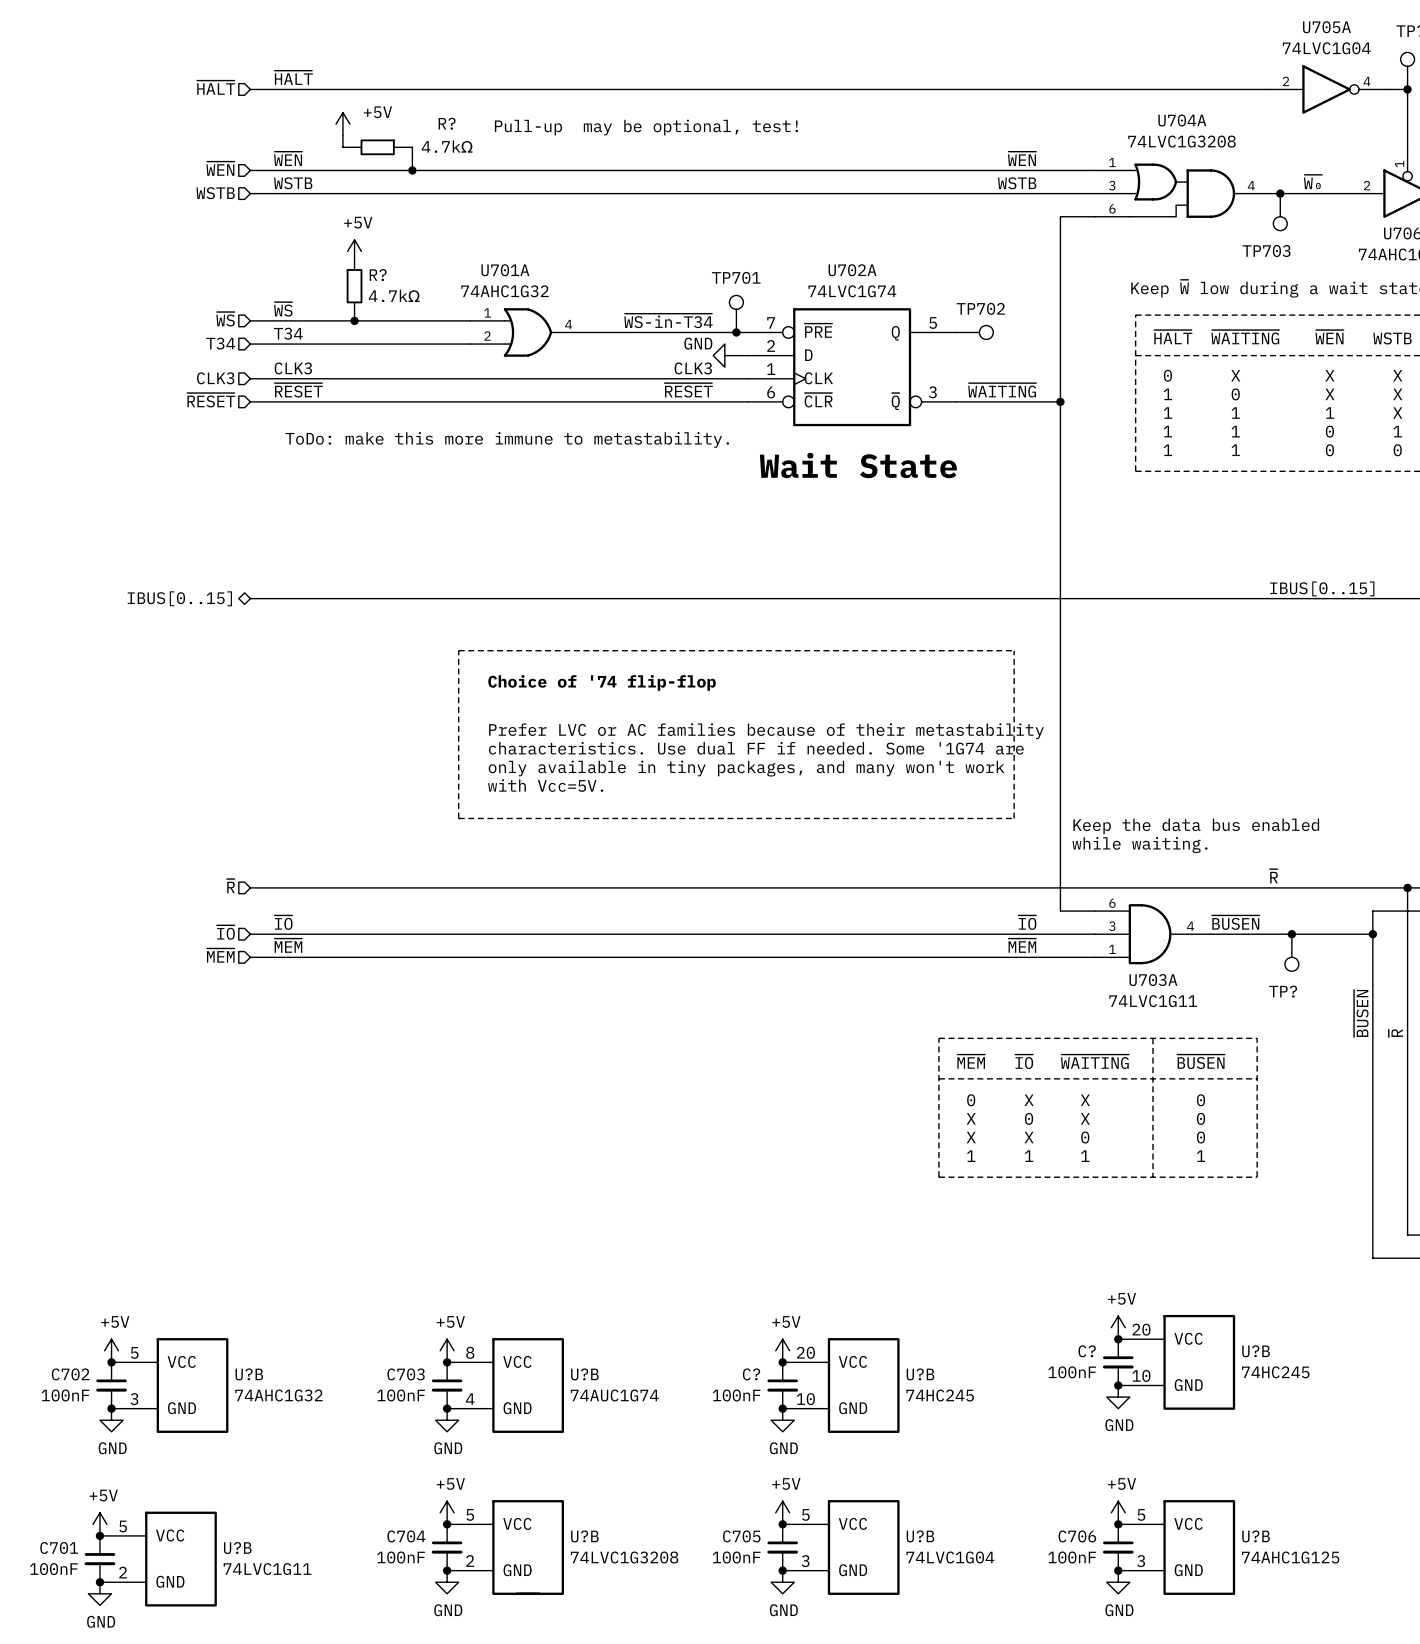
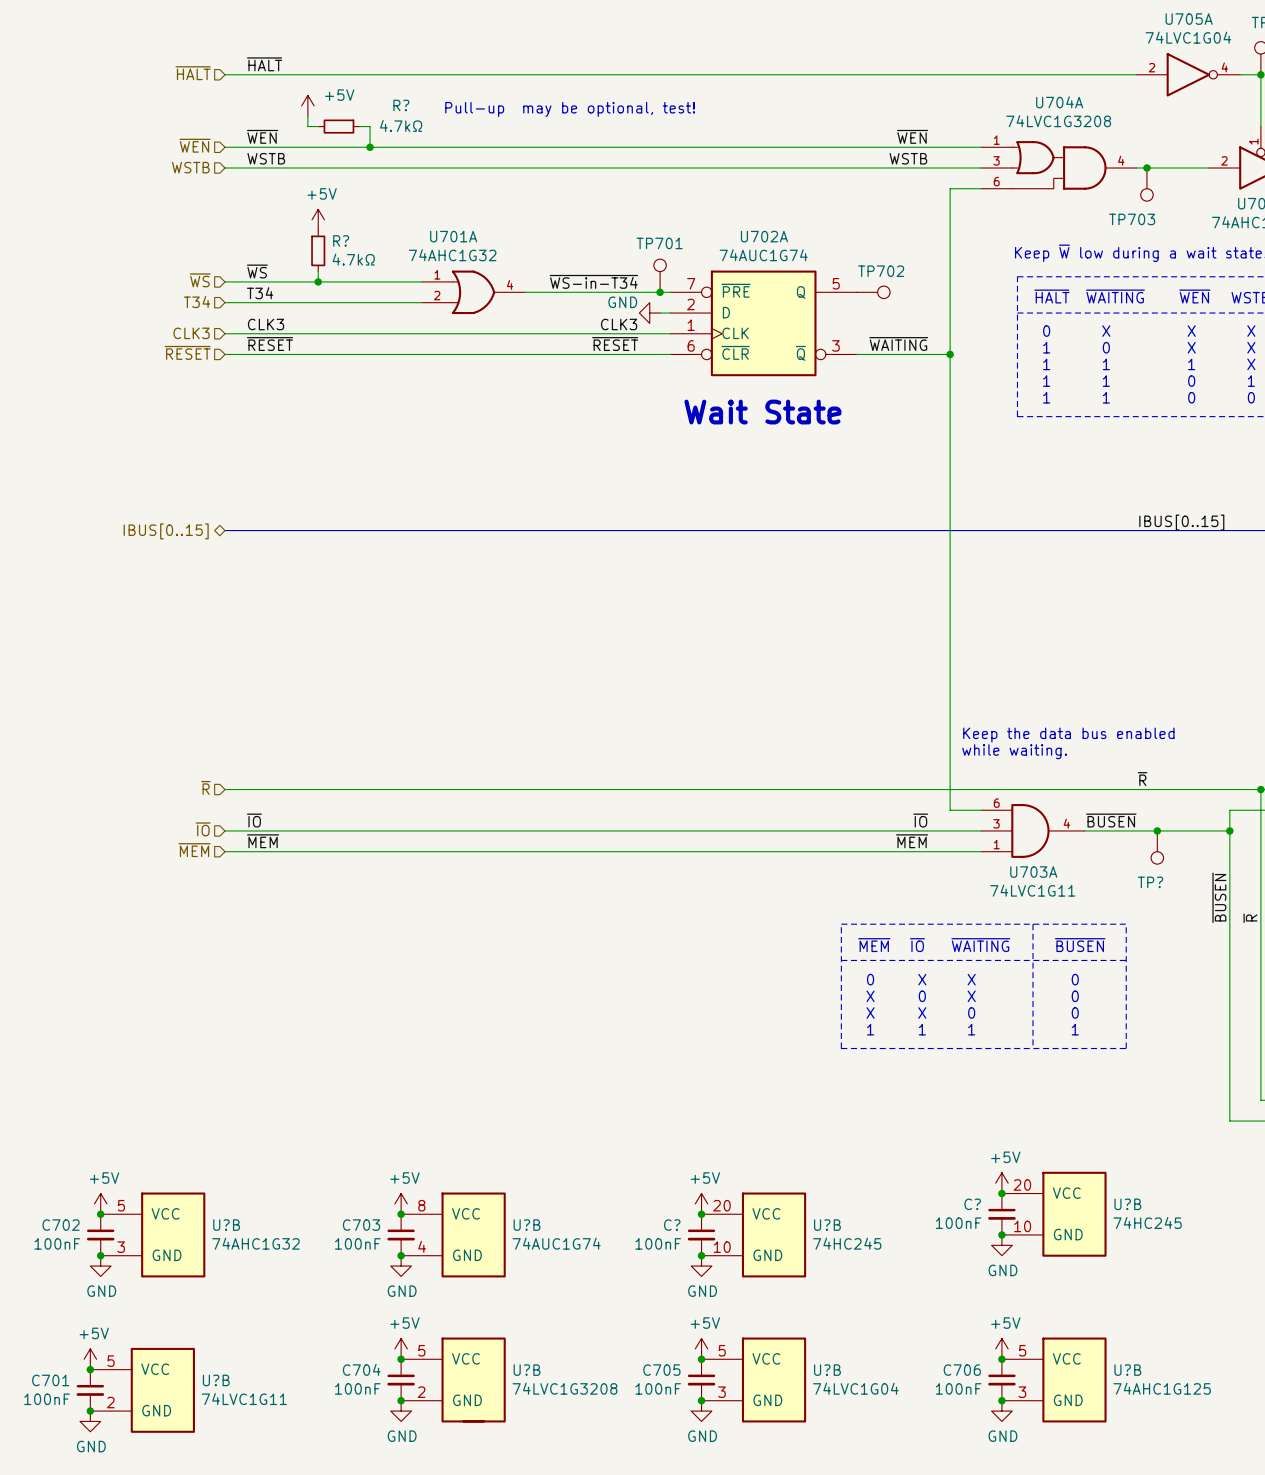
label: ~{W₀} (1313, 182) -> none
U702A value: 74LVC1G74 (852, 291) -> 74AUC1G74 (763, 255)
text: ToDo: make this more immune to metastability. (507, 439) -> none
line: (458, 650) (1014, 650) (1014, 818) (458, 818) (458, 650) -> none
text: Choice of '74 flip-flop (602, 682) -> none
text: Prefer LVC or AC families because of their metastability (766, 731) -> none
text: characteristics. Use dual FF if needed. Some '1G74 are (756, 748) -> none
text: only available in tiny packages, and many won't work (746, 768) -> none
text: with Vcc=5V. (545, 785) -> none

